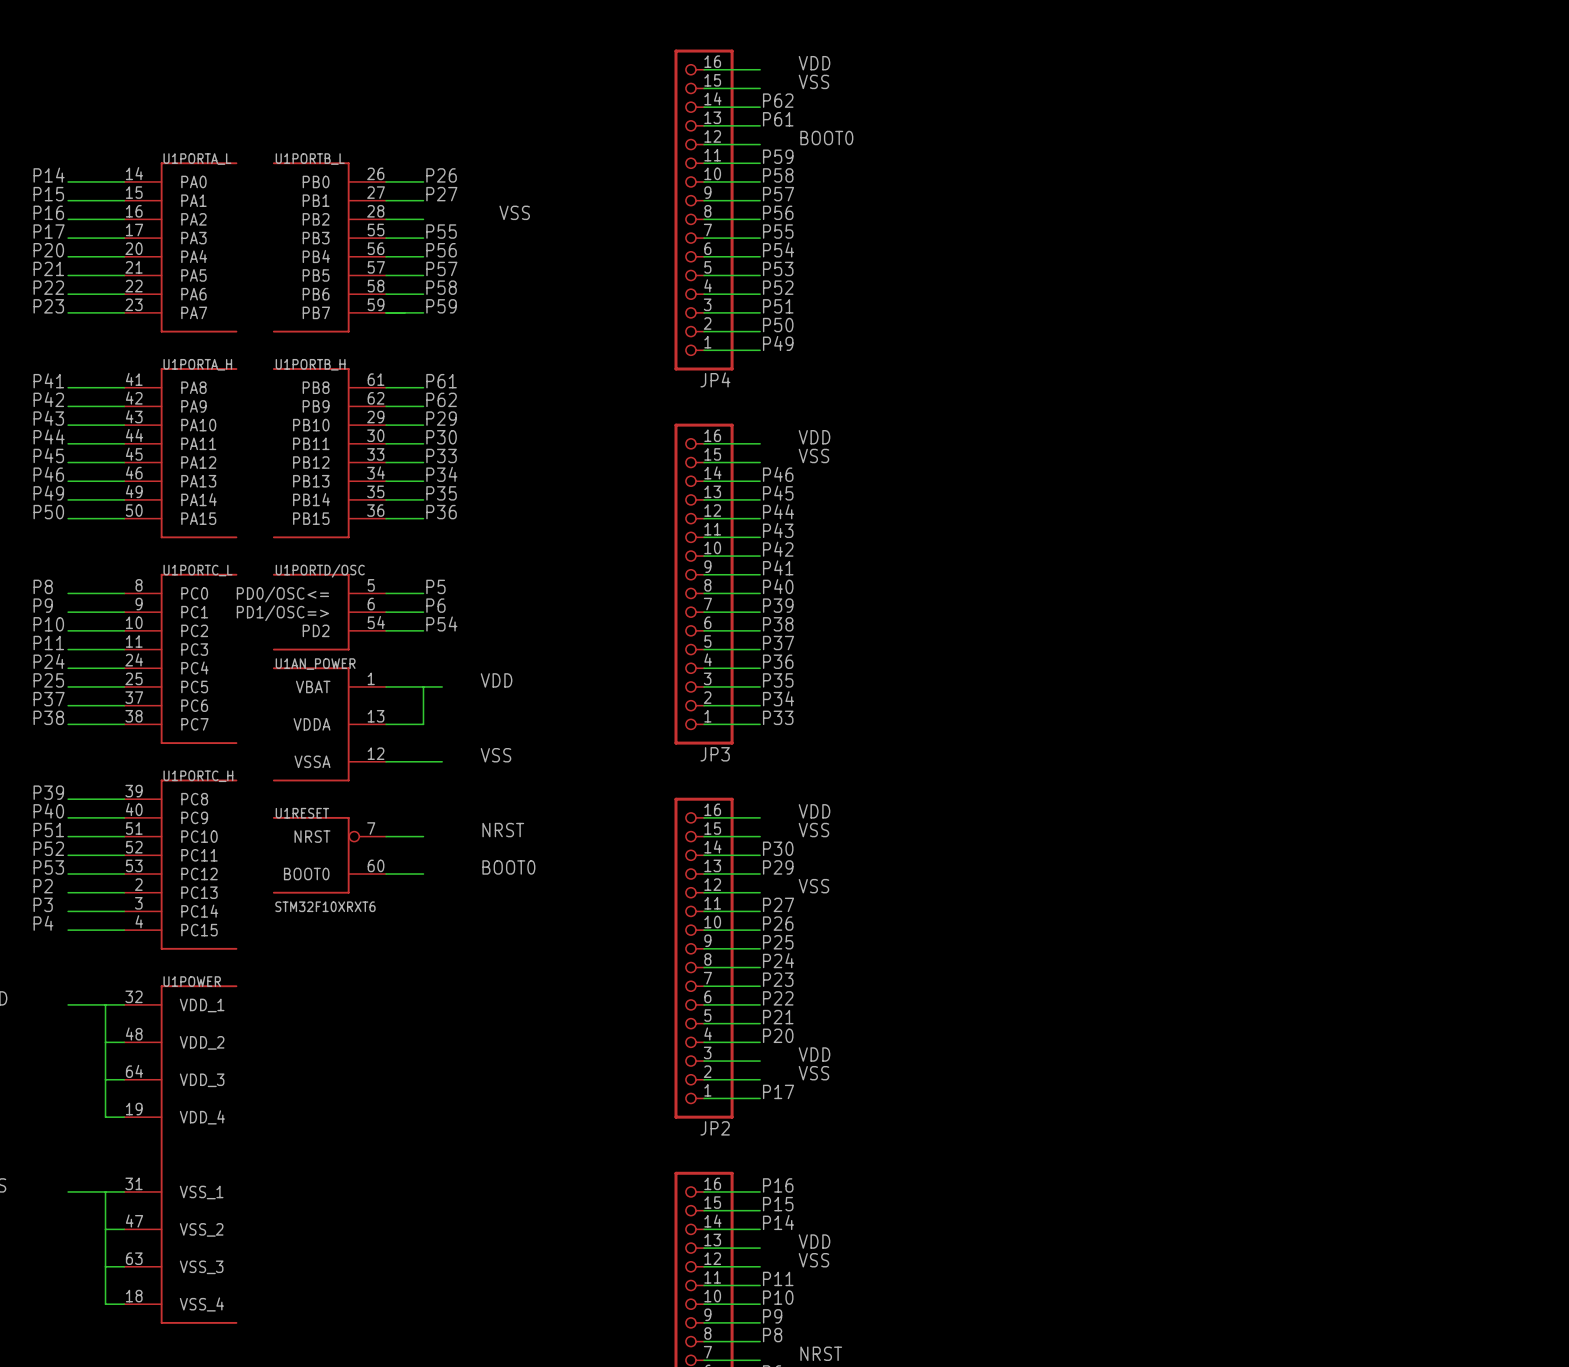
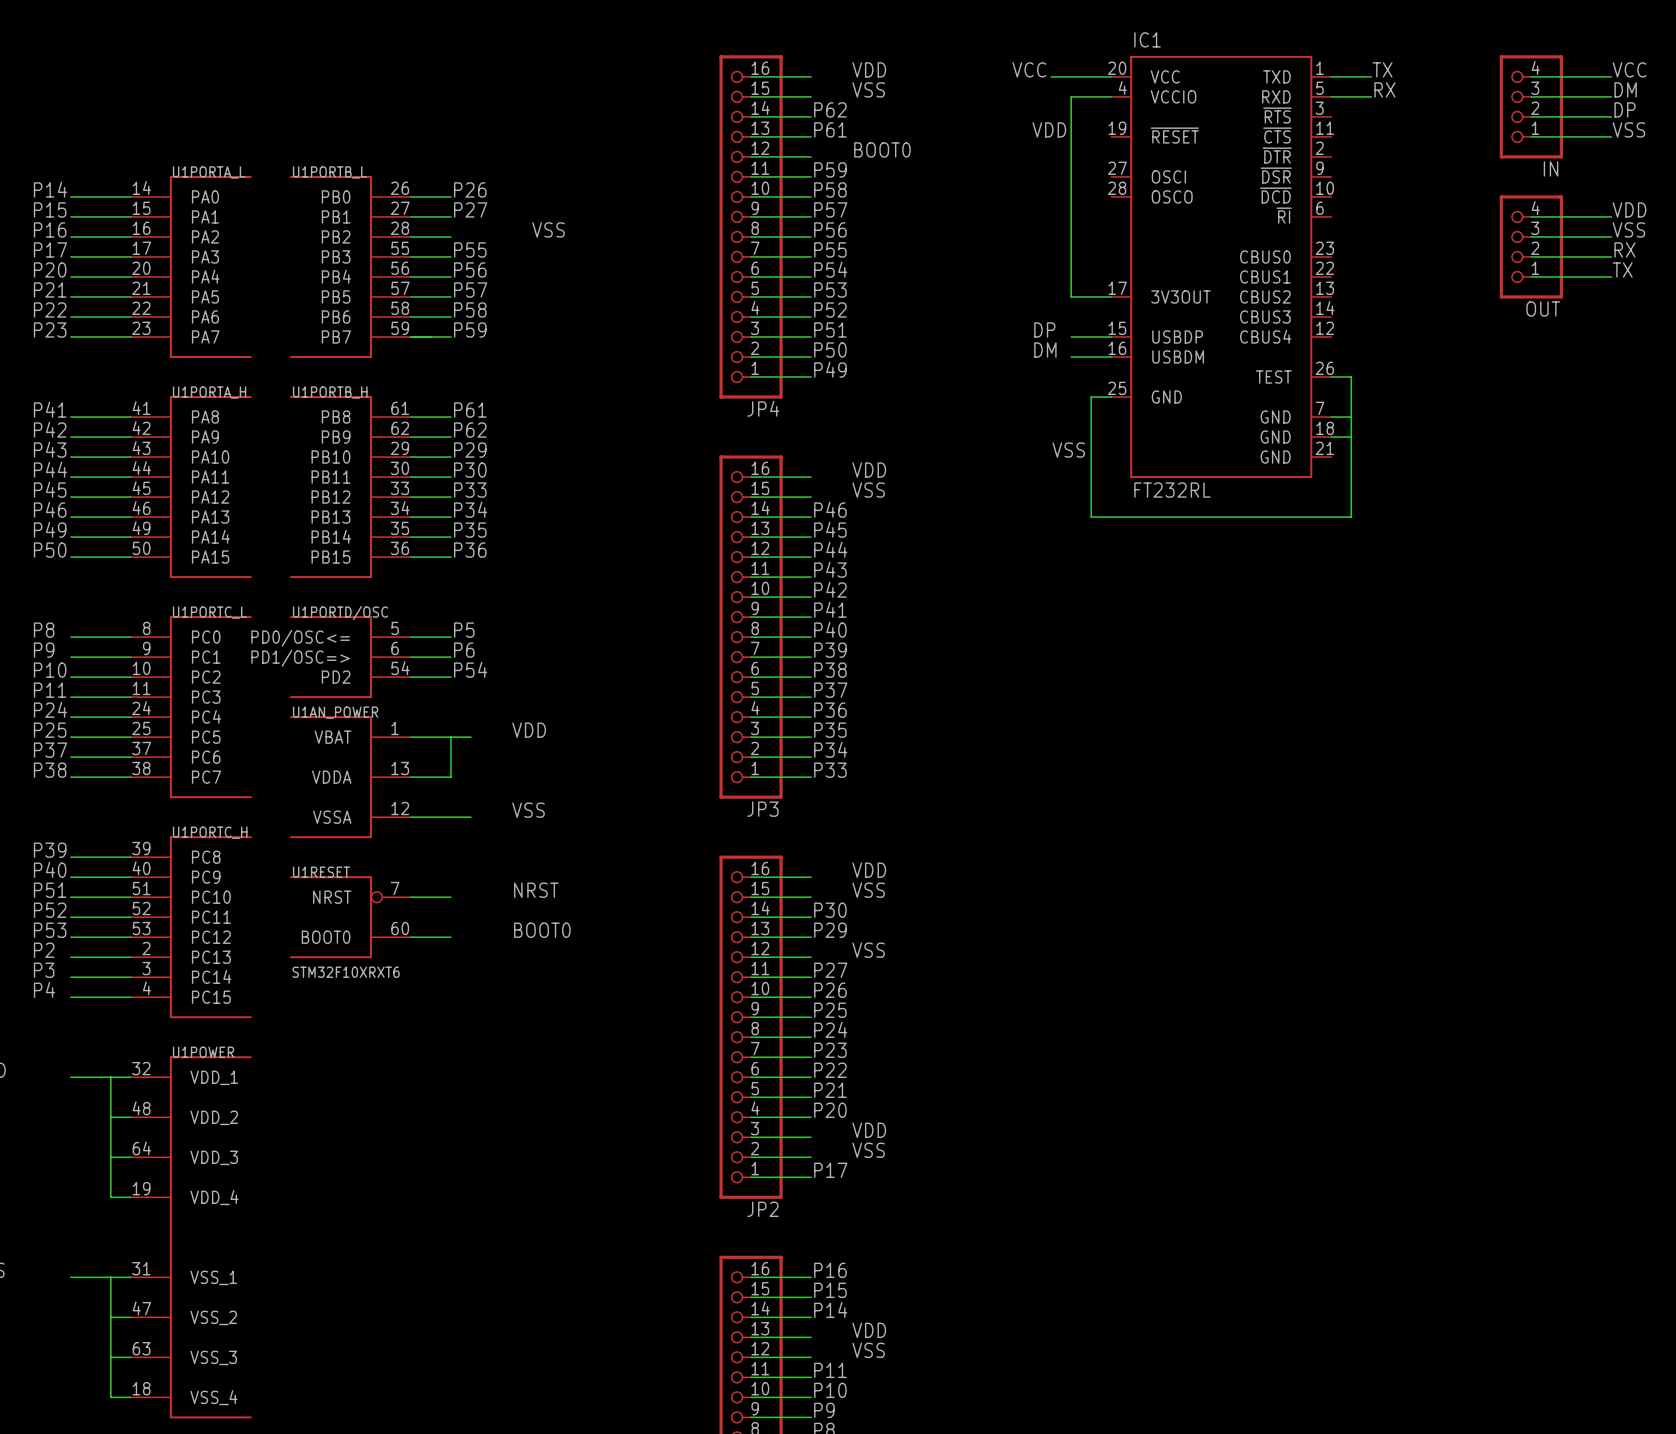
label: none -> VCC (1029, 69)
label: none -> TX (1382, 69)
label: none -> VCC (1629, 69)
wire: none -> (1051, 76) (1111, 76)
wire: none -> (1331, 76) (1371, 76)
wire: none -> (1531, 76) (1611, 76)
label: none -> RX (1384, 89)
label: none -> DM (1625, 89)
wire: none -> (1111, 96) (1071, 96) (1071, 296) (1111, 296)
wire: none -> (1331, 96) (1371, 96)
wire: none -> (1531, 96) (1611, 96)
IN: none -> (1531, 106)
label: none -> DP (1625, 109)
wire: none -> (1531, 116) (1611, 116)
label: none -> VDD (1049, 129)
label: none -> VSS (1628, 129)
wire: none -> (1531, 136) (1611, 136)
label: none -> VDD (1629, 209)
wire: none -> (1531, 216) (1611, 216)
label: none -> VSS (1628, 229)
wire: none -> (1531, 236) (1611, 236)
OUT: none -> (1531, 246)
label: none -> RX (1625, 249)
wire: none -> (1531, 256) (1611, 256)
IC1: none -> FT232RL (1221, 266)
label: none -> TX (1622, 269)
wire: none -> (1531, 276) (1611, 276)
label: none -> DP (1044, 329)
wire: none -> (1071, 337) (1111, 337)
label: none -> DM (1045, 350)
wire: none -> (1071, 357) (1111, 357)
wire: none -> (1331, 377) (1351, 377) (1351, 517) (1091, 517) (1091, 397) (1111, 397)
wire: none -> (1331, 417) (1351, 417)
wire: none -> (1331, 437) (1351, 437)
label: none -> VSS (1068, 450)

